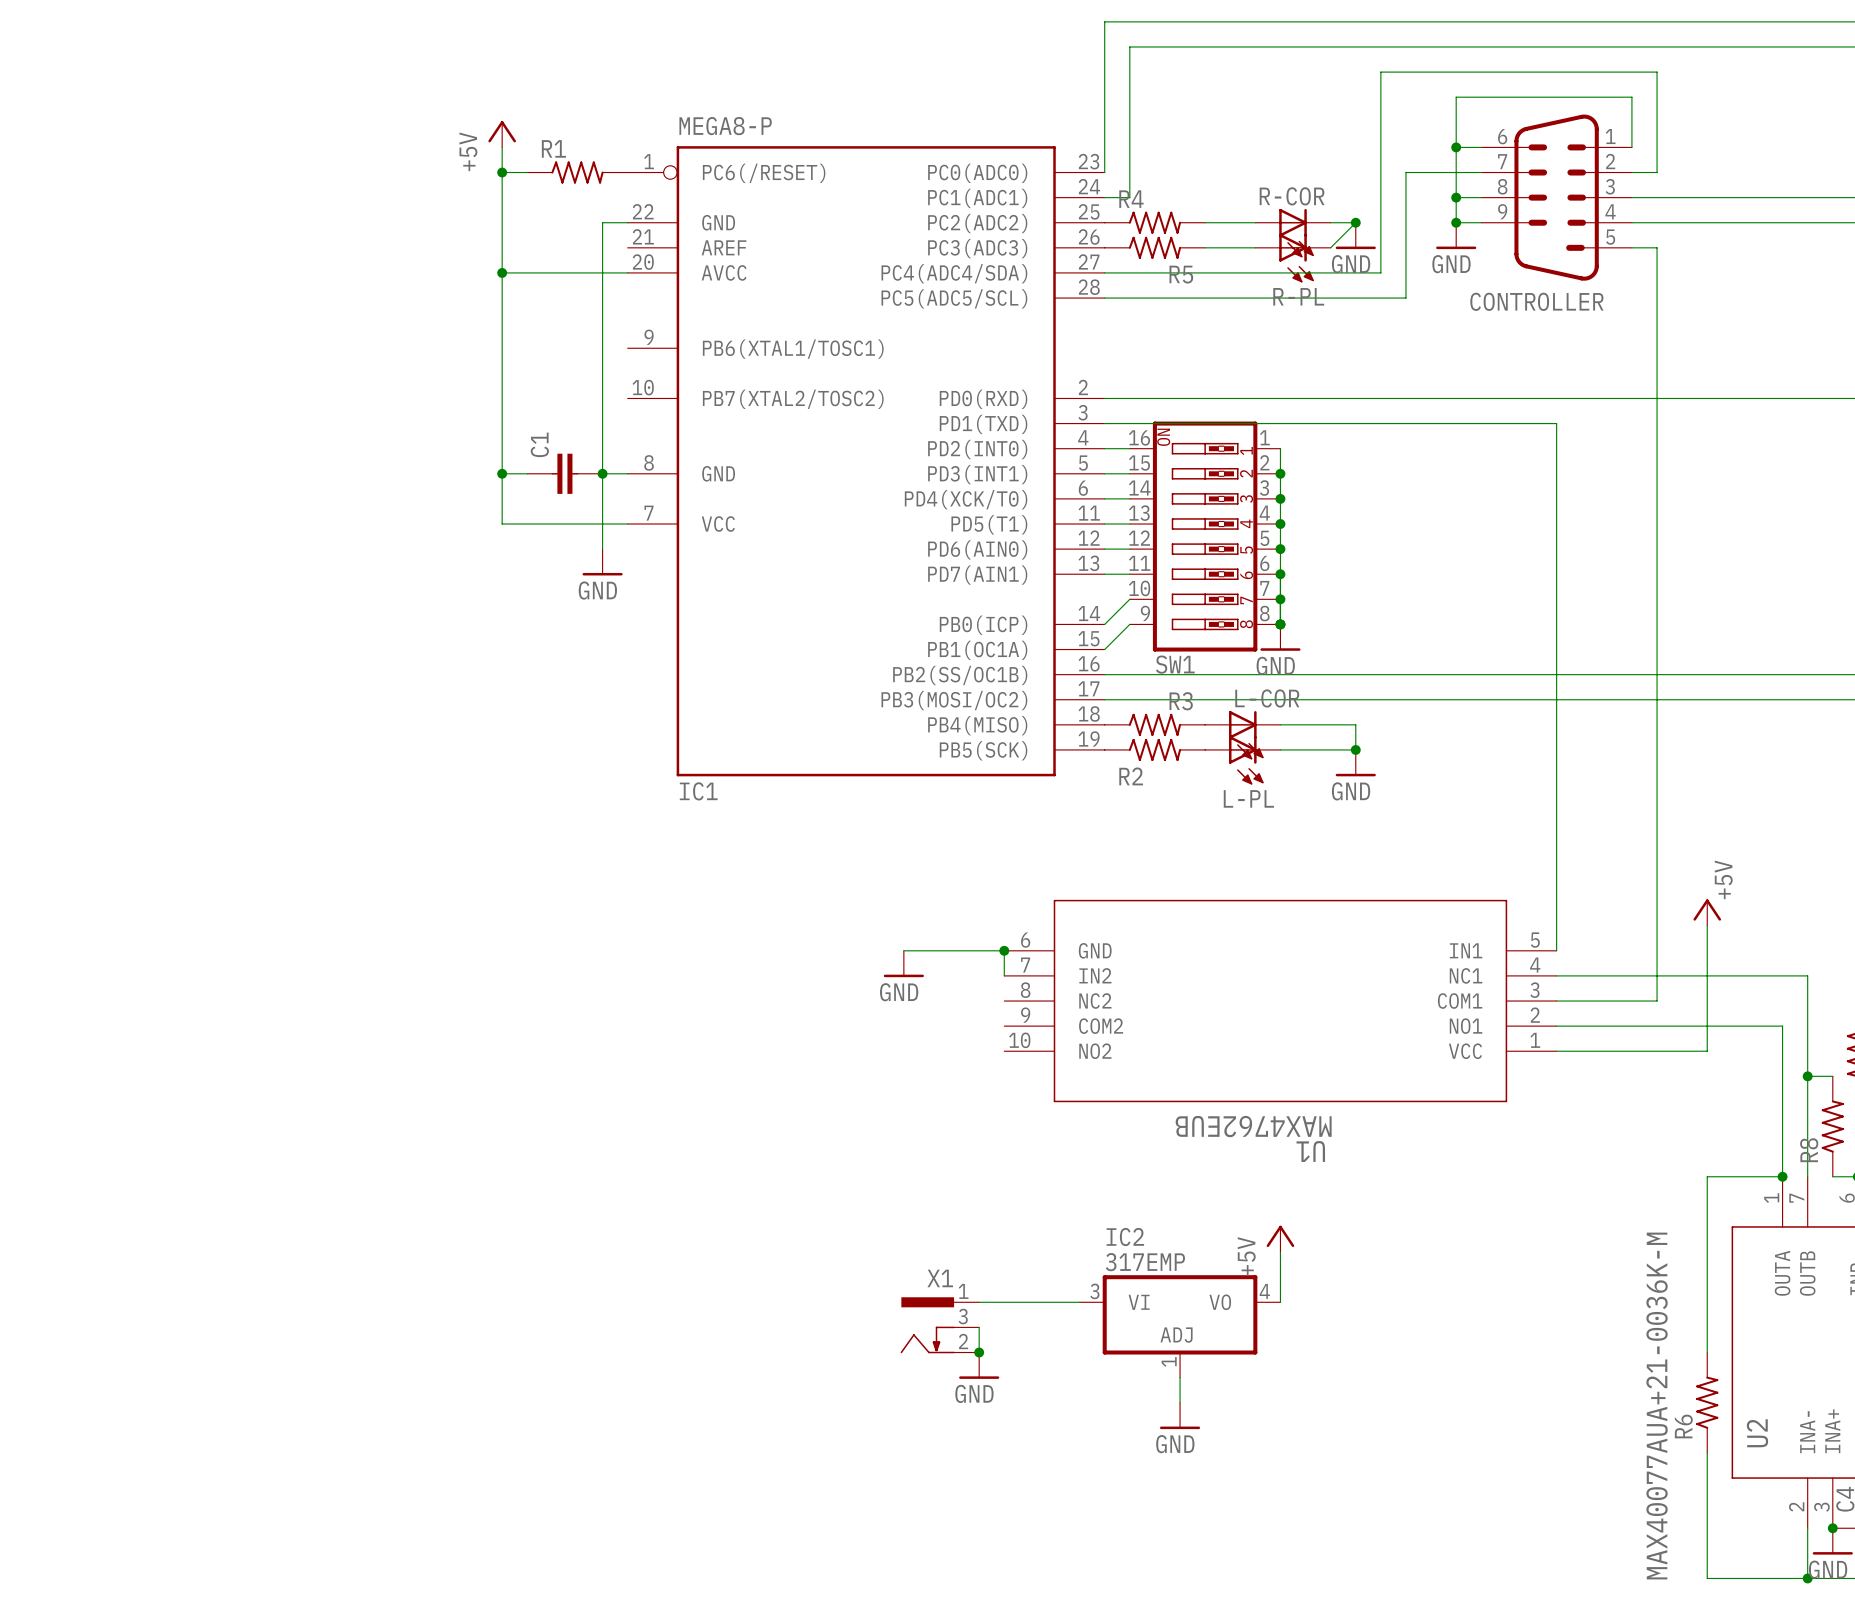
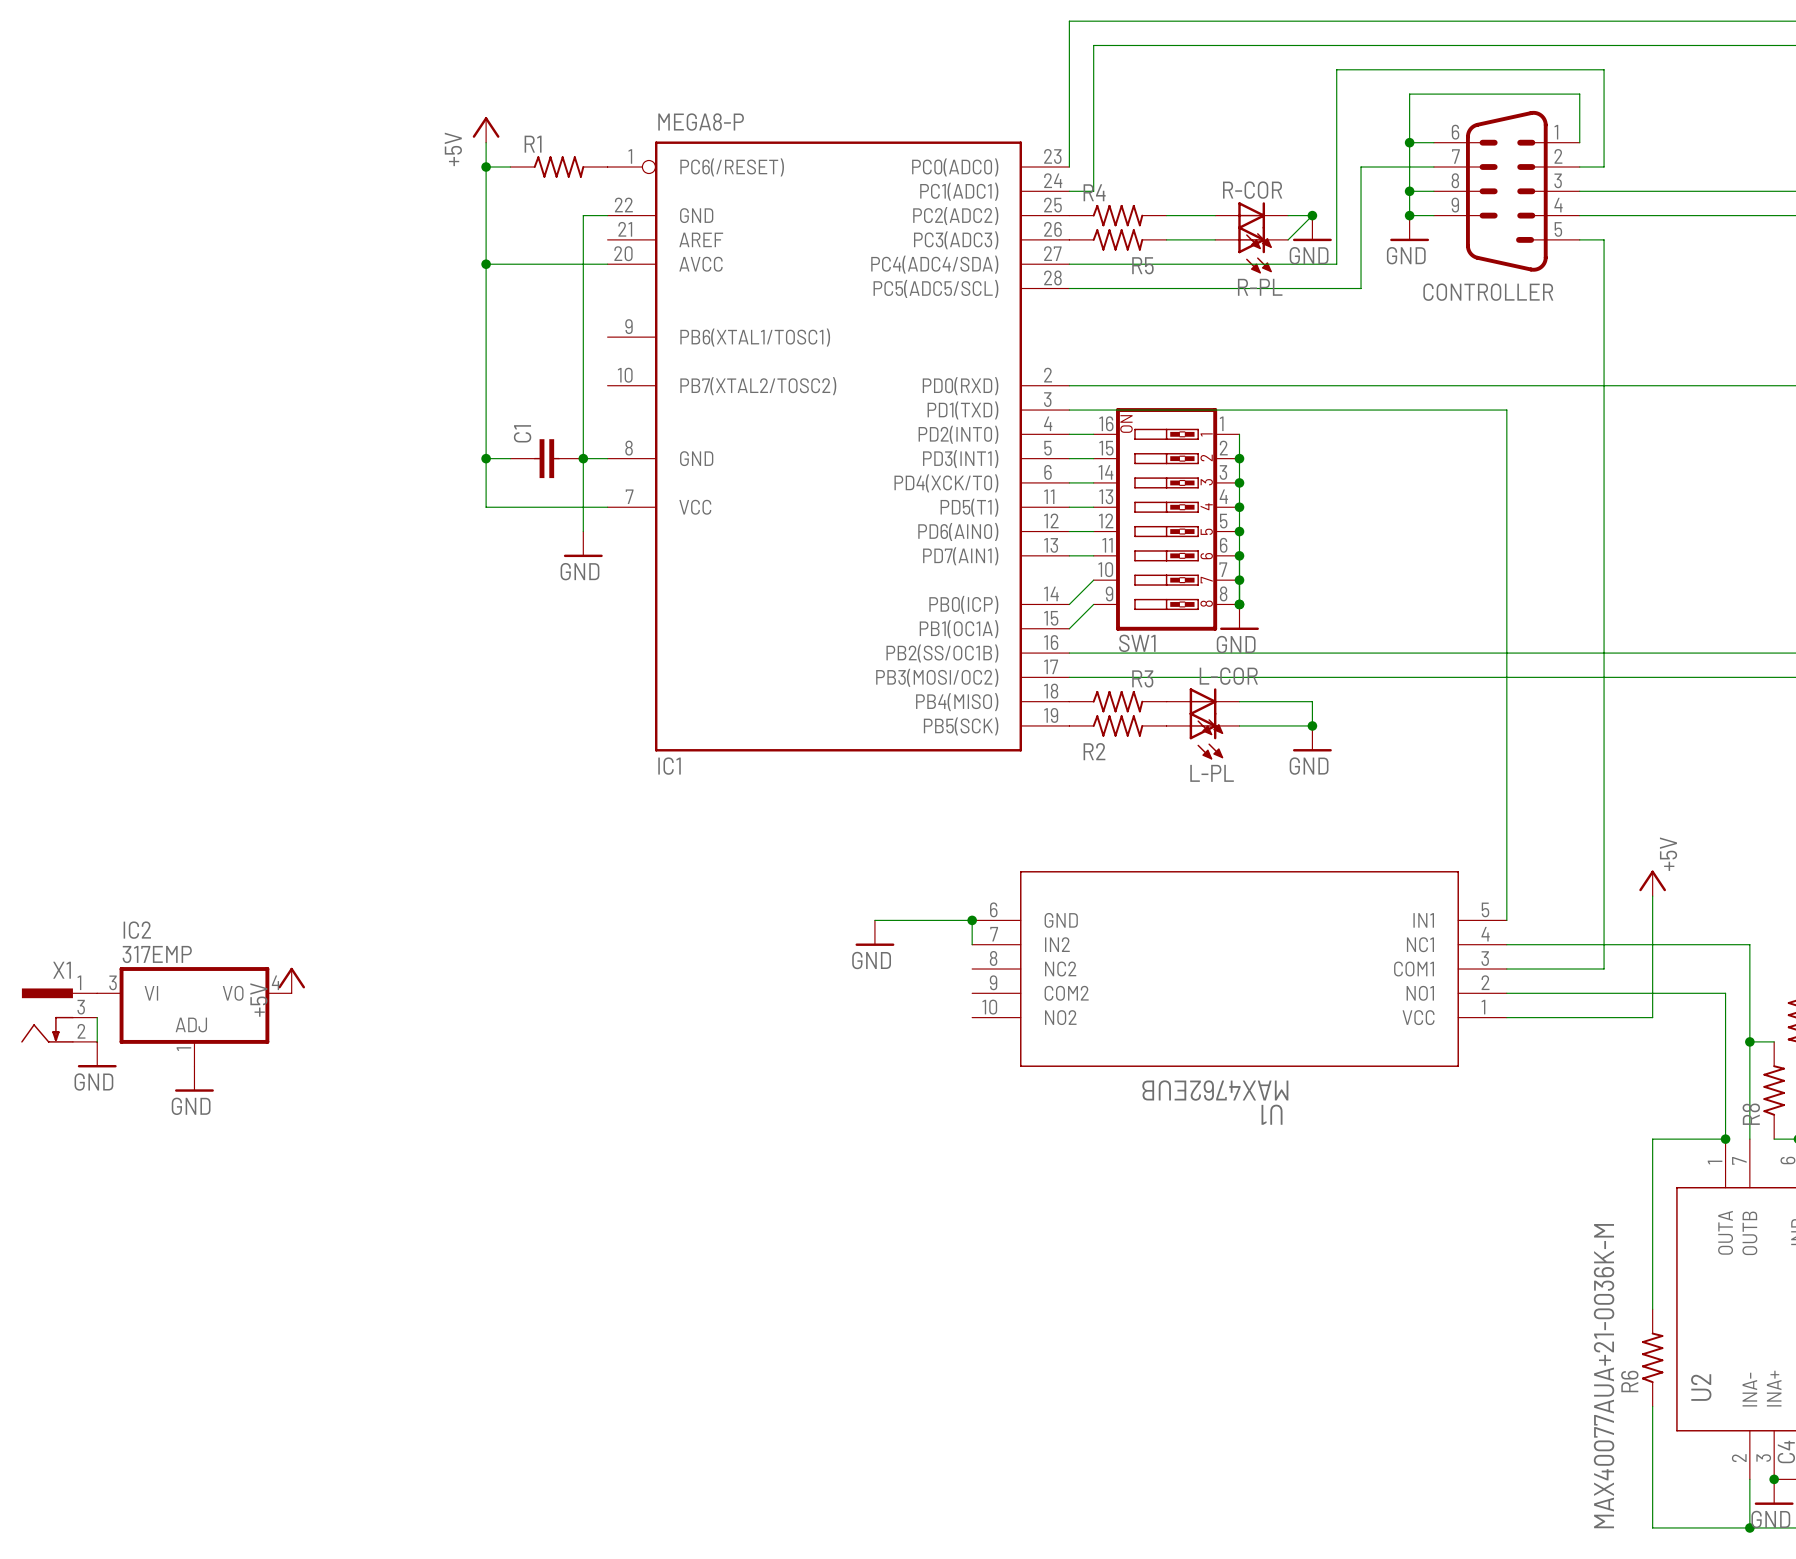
power symbol: none -> +5V (291, 980)
wire: none -> (97, 1017) (97, 1041)
power symbol: none -> GND (97, 1054)
power symbol: none -> GND (194, 1078)
power symbol: +5V (1280, 1238) -> none
wire: (1280, 1252) (1280, 1302) -> none
wire: (979, 1302) (1079, 1302) -> none
X1 position: (939, 1325) -> (59, 1015)
IC2 position: (1180, 1326) -> (194, 1016)
wire: (979, 1327) (979, 1352) -> none
junction: (979, 1352) -> none
power symbol: GND (979, 1365) -> none
wire: (1180, 1377) (1180, 1402) -> none
power symbol: GND (1180, 1415) -> none

